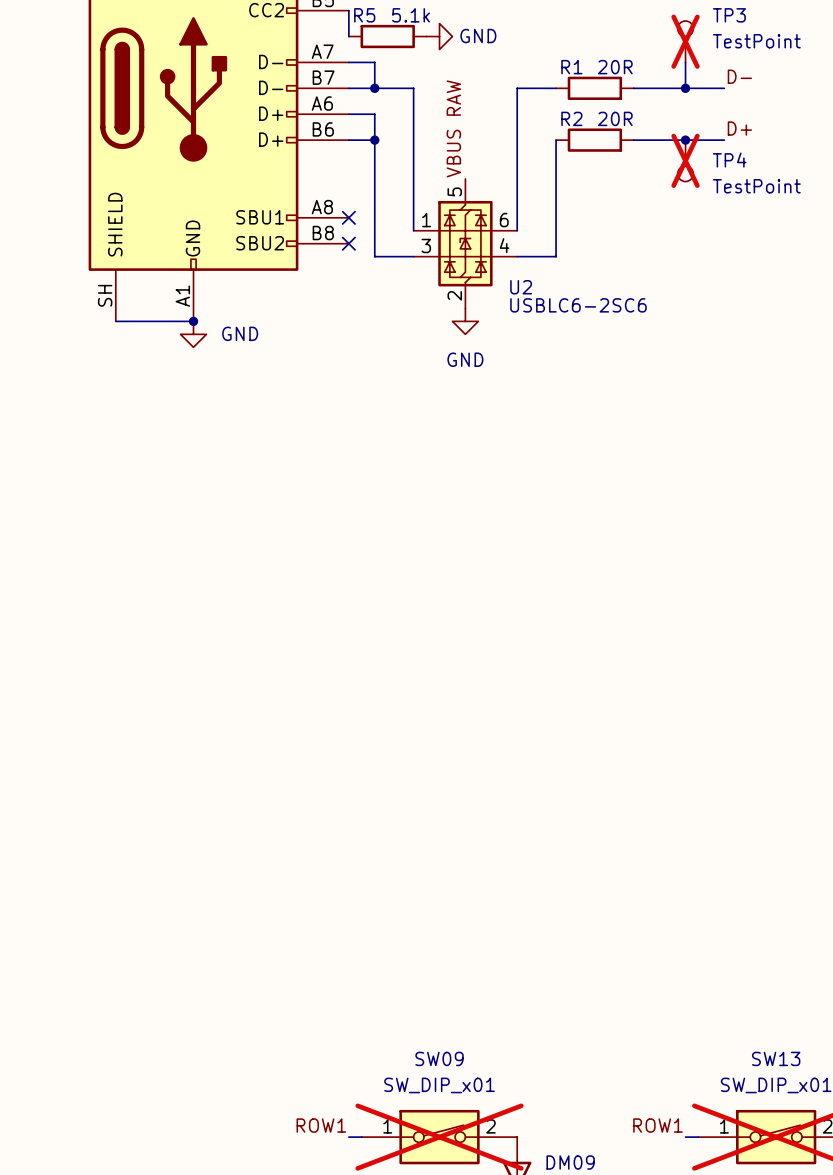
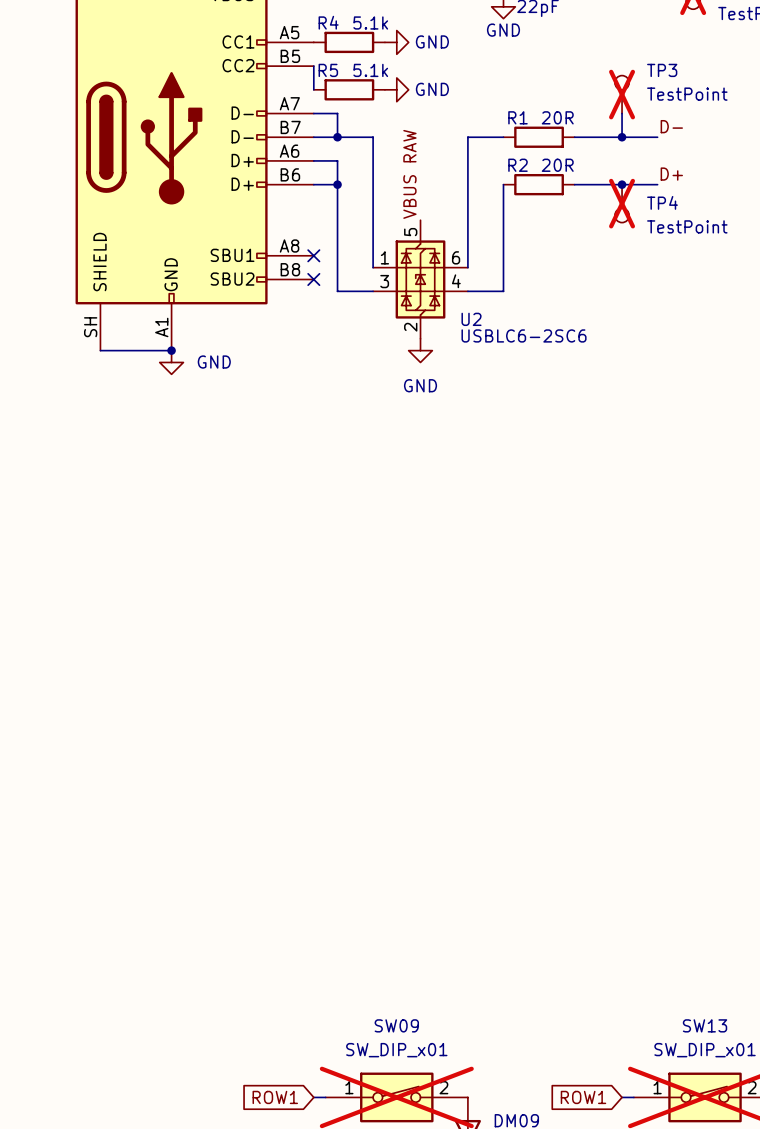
label: ROW1 (321, 1125) -> none
label: ROW1 (657, 1125) -> none
global label: none -> ROW1 (275, 1097)
global label: none -> ROW1 (583, 1097)

